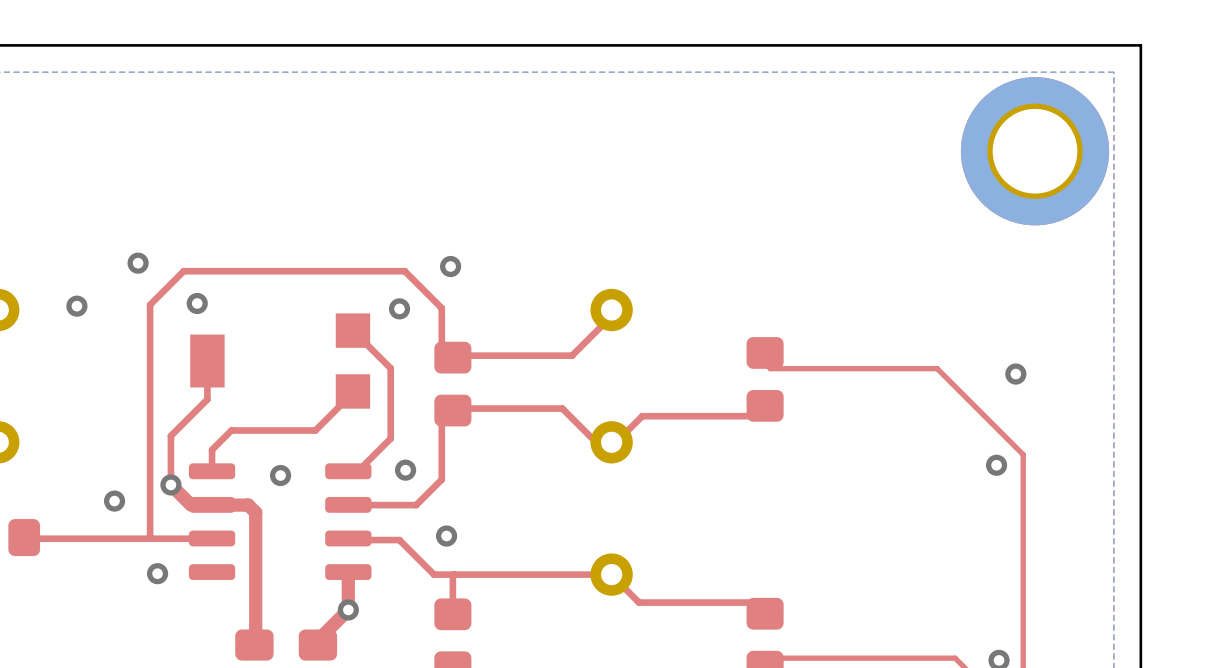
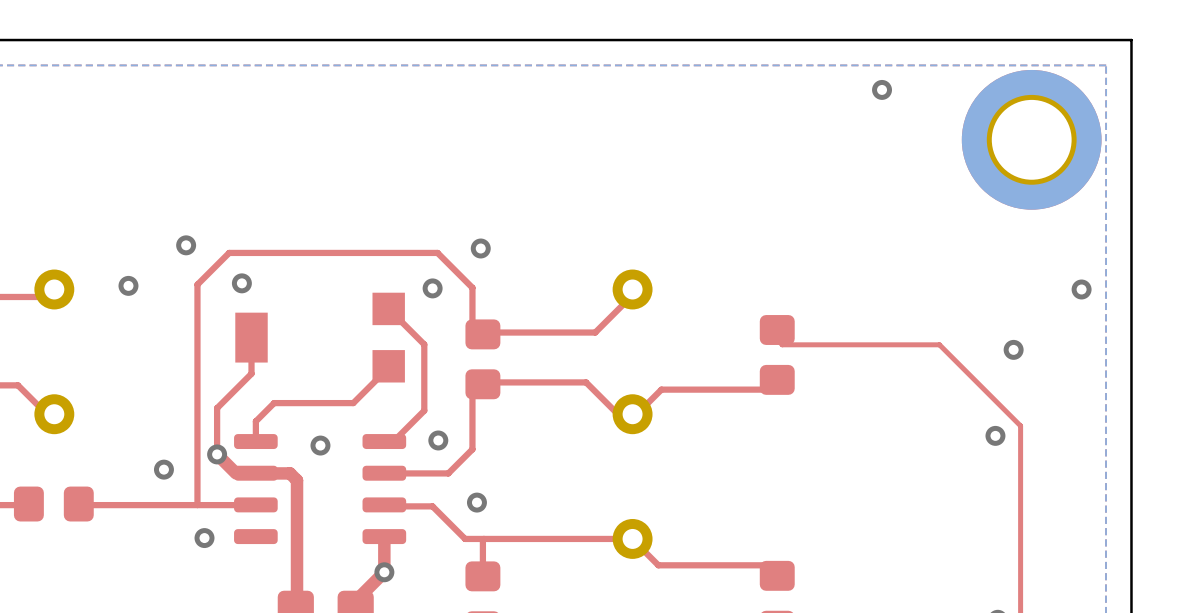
via: none -> (882, 89)
via: none -> (1081, 289)

